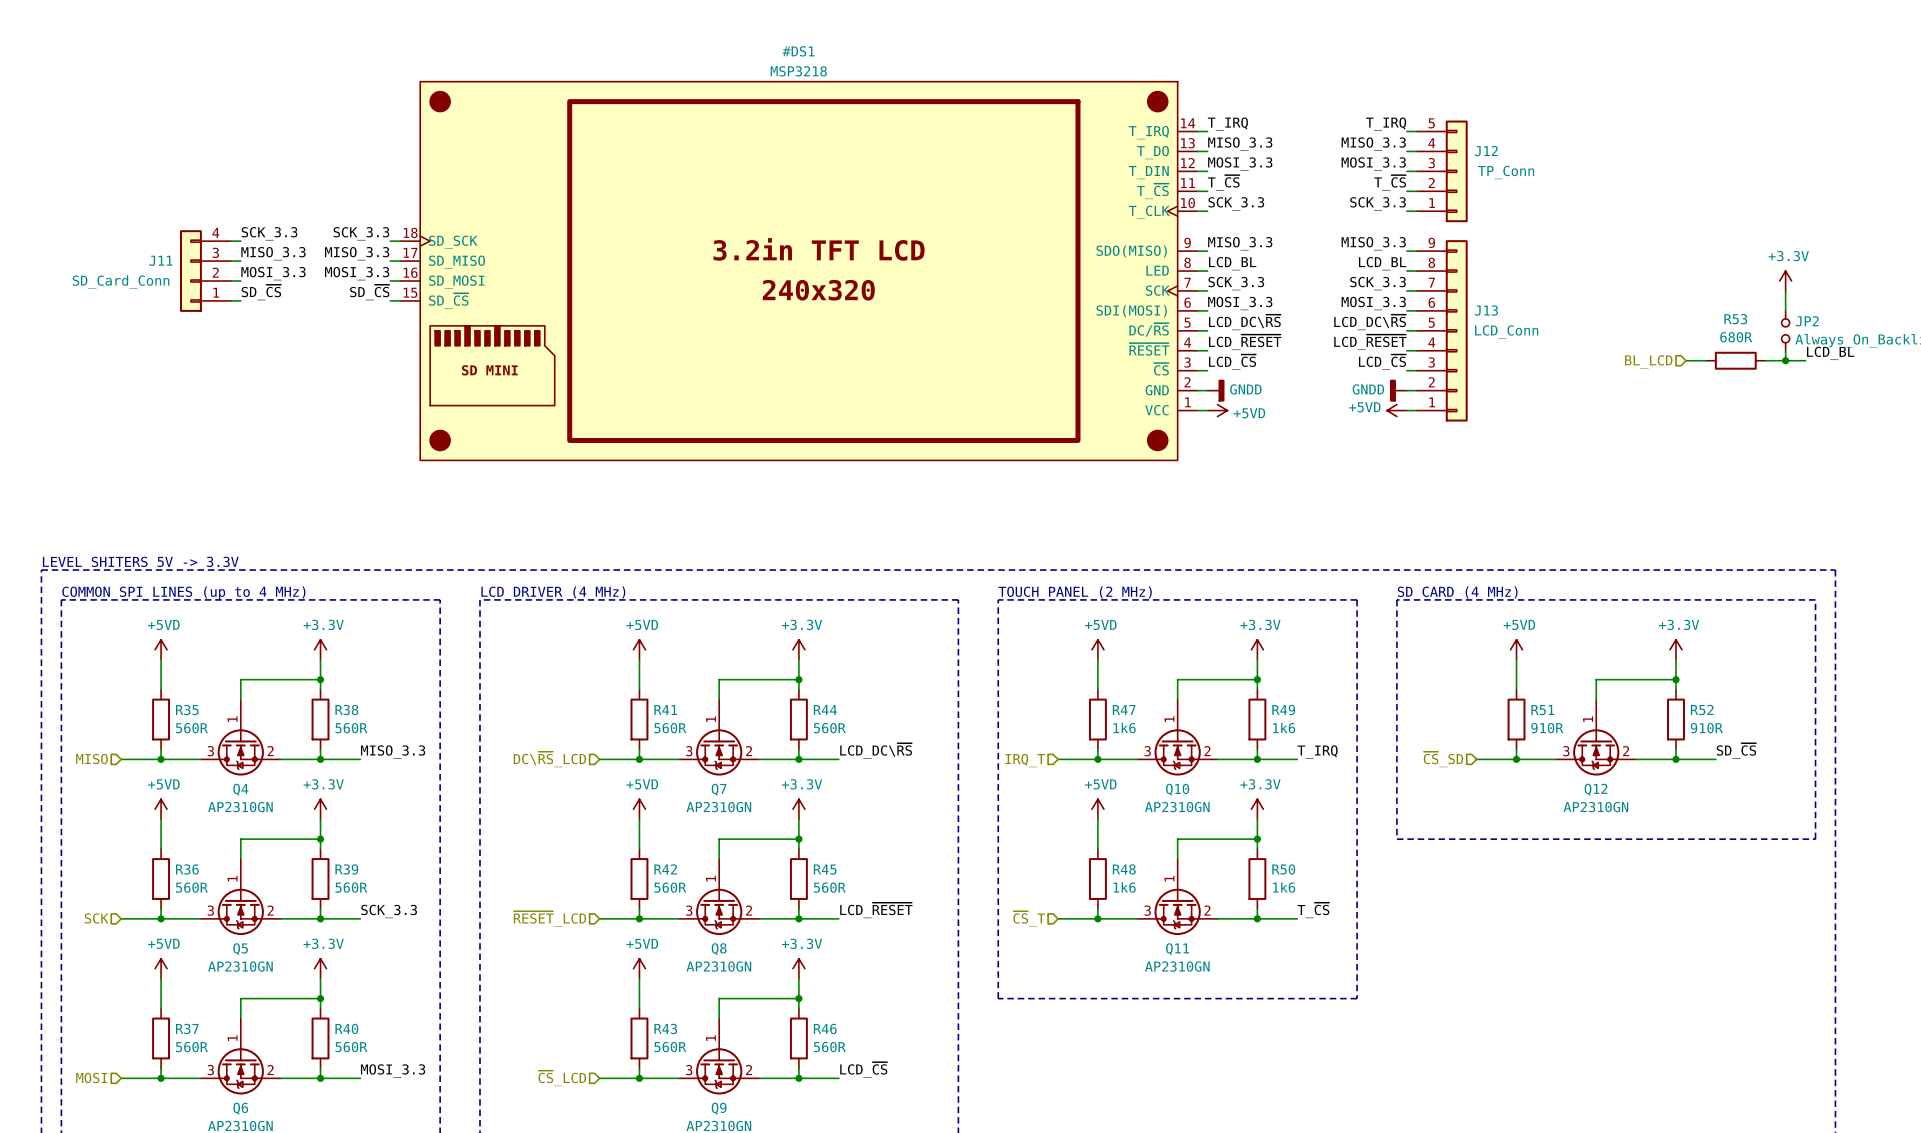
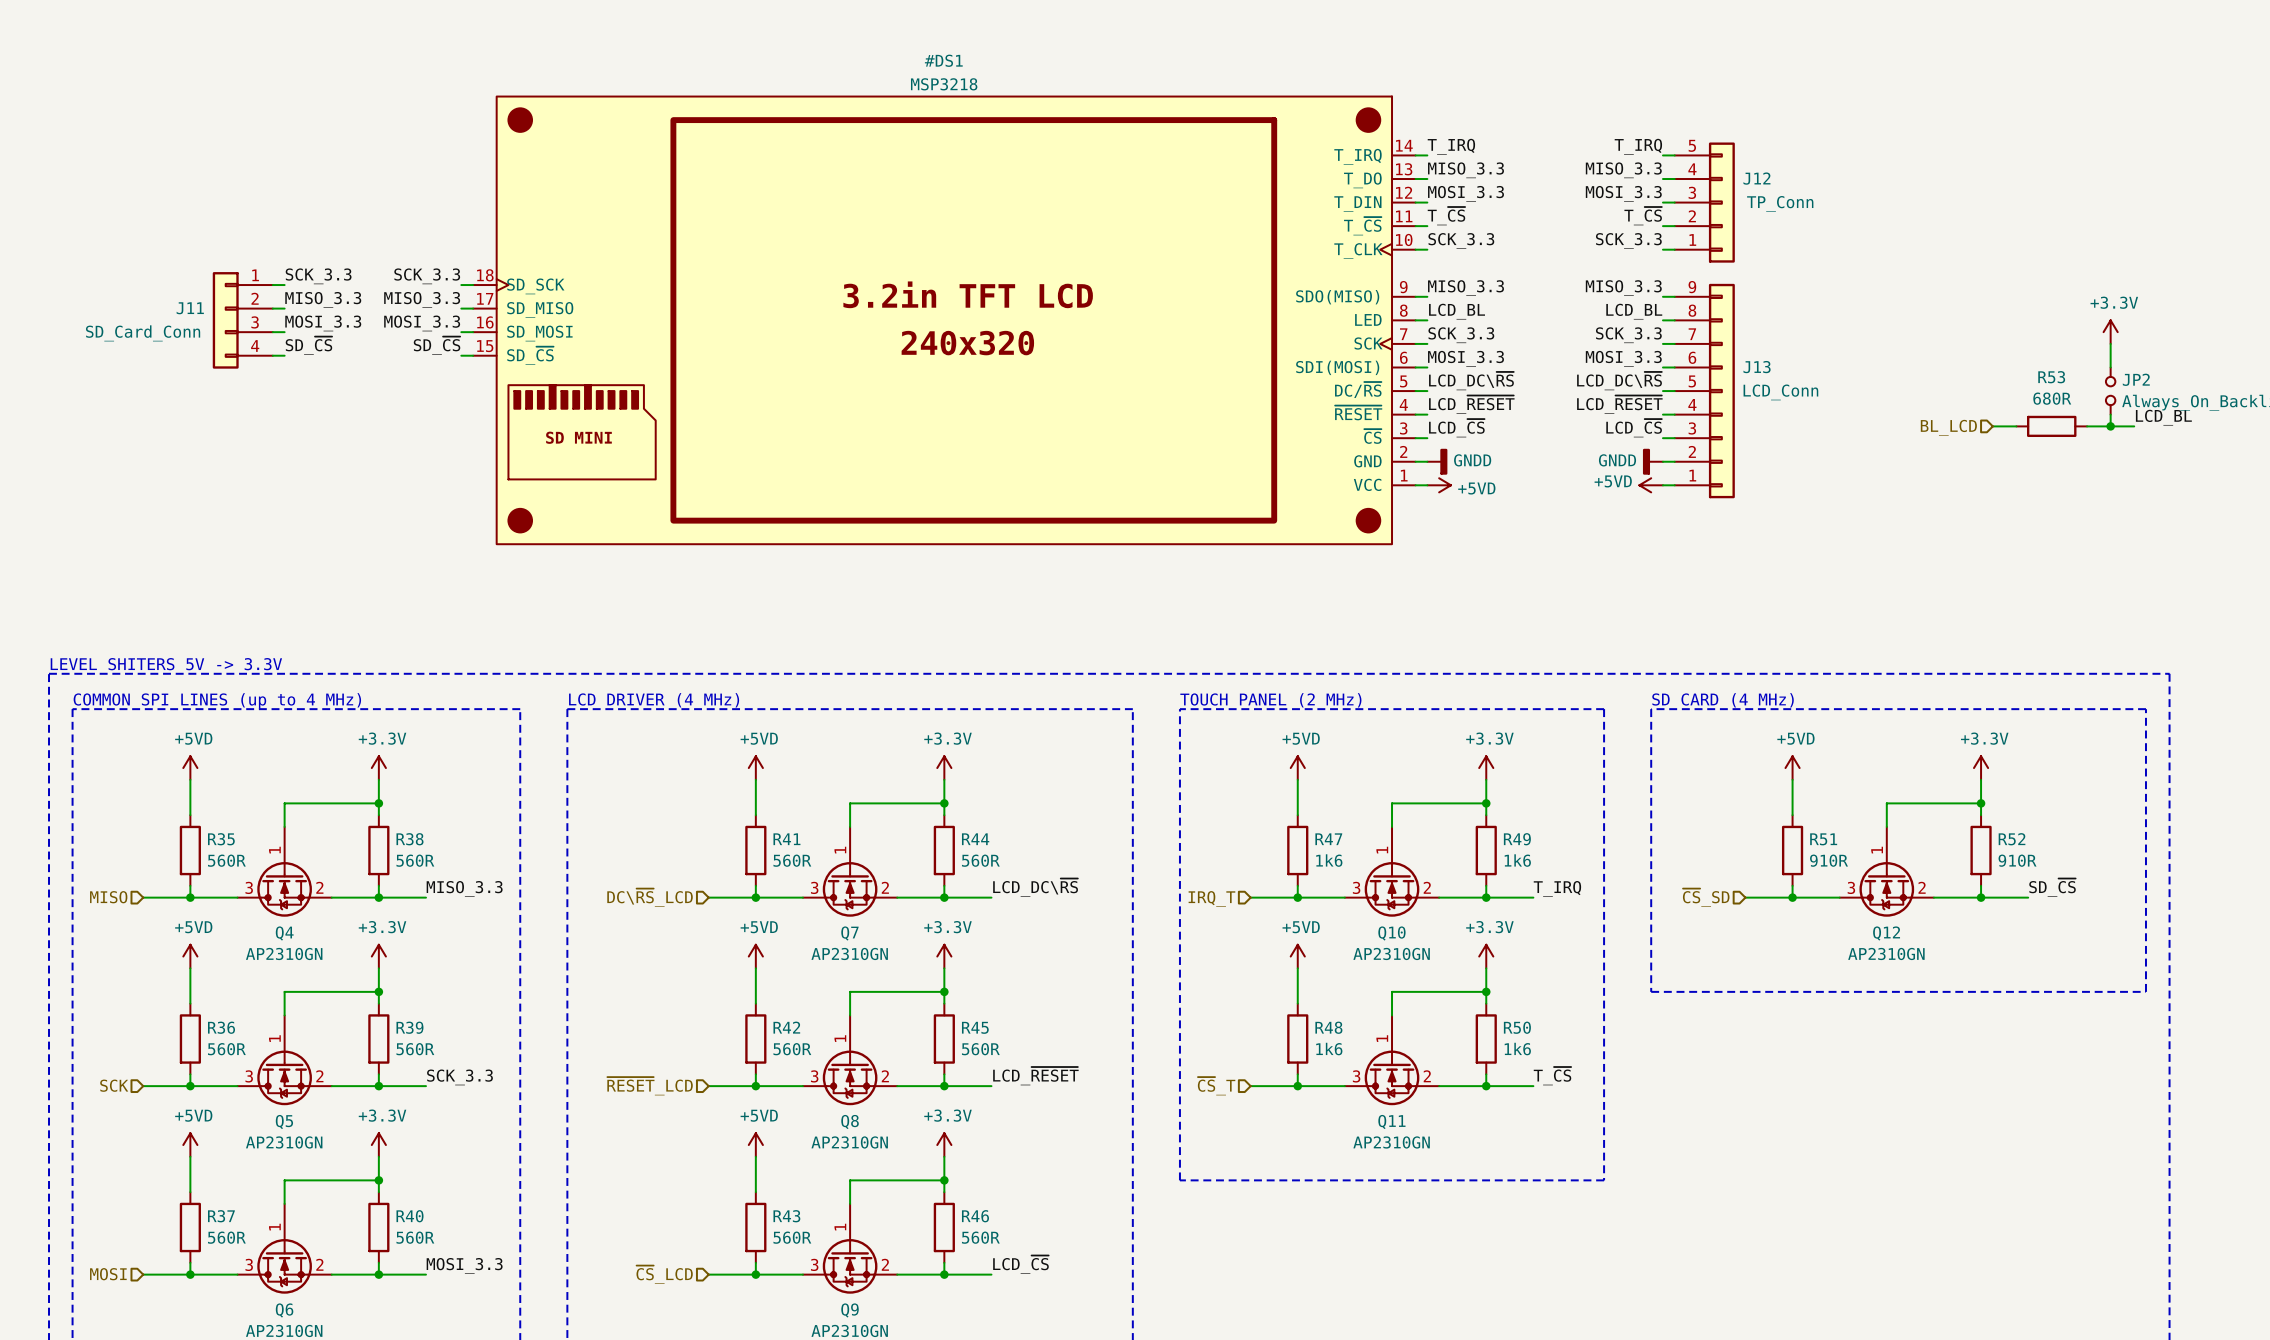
J11 flip: as is (190, 271) -> up-down (225, 320)

